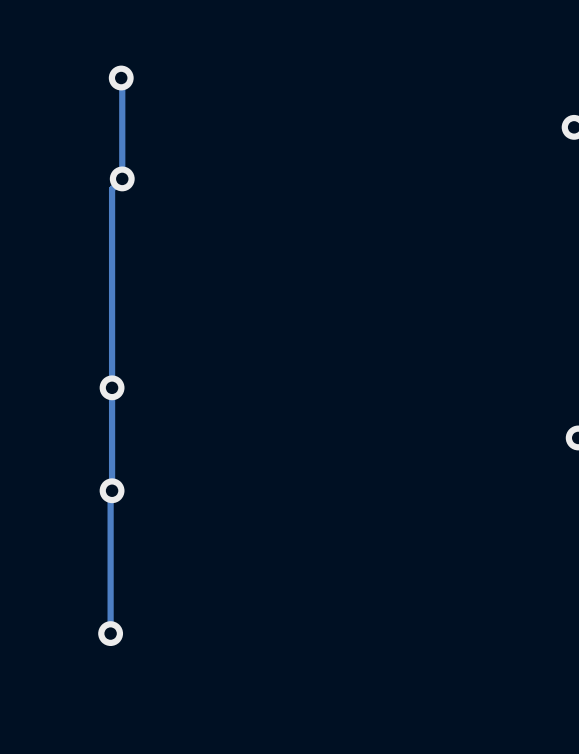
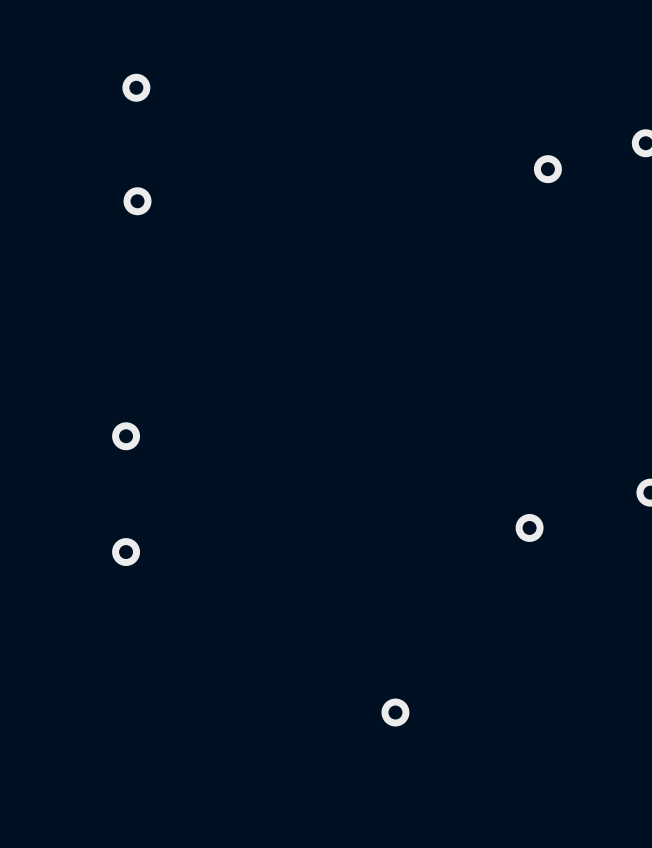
track: (121, 78) (122, 178) (112, 189) (110, 633) -> none
via: none -> (547, 169)
via: none -> (529, 527)
via: (110, 633) -> none
via: none -> (395, 712)

